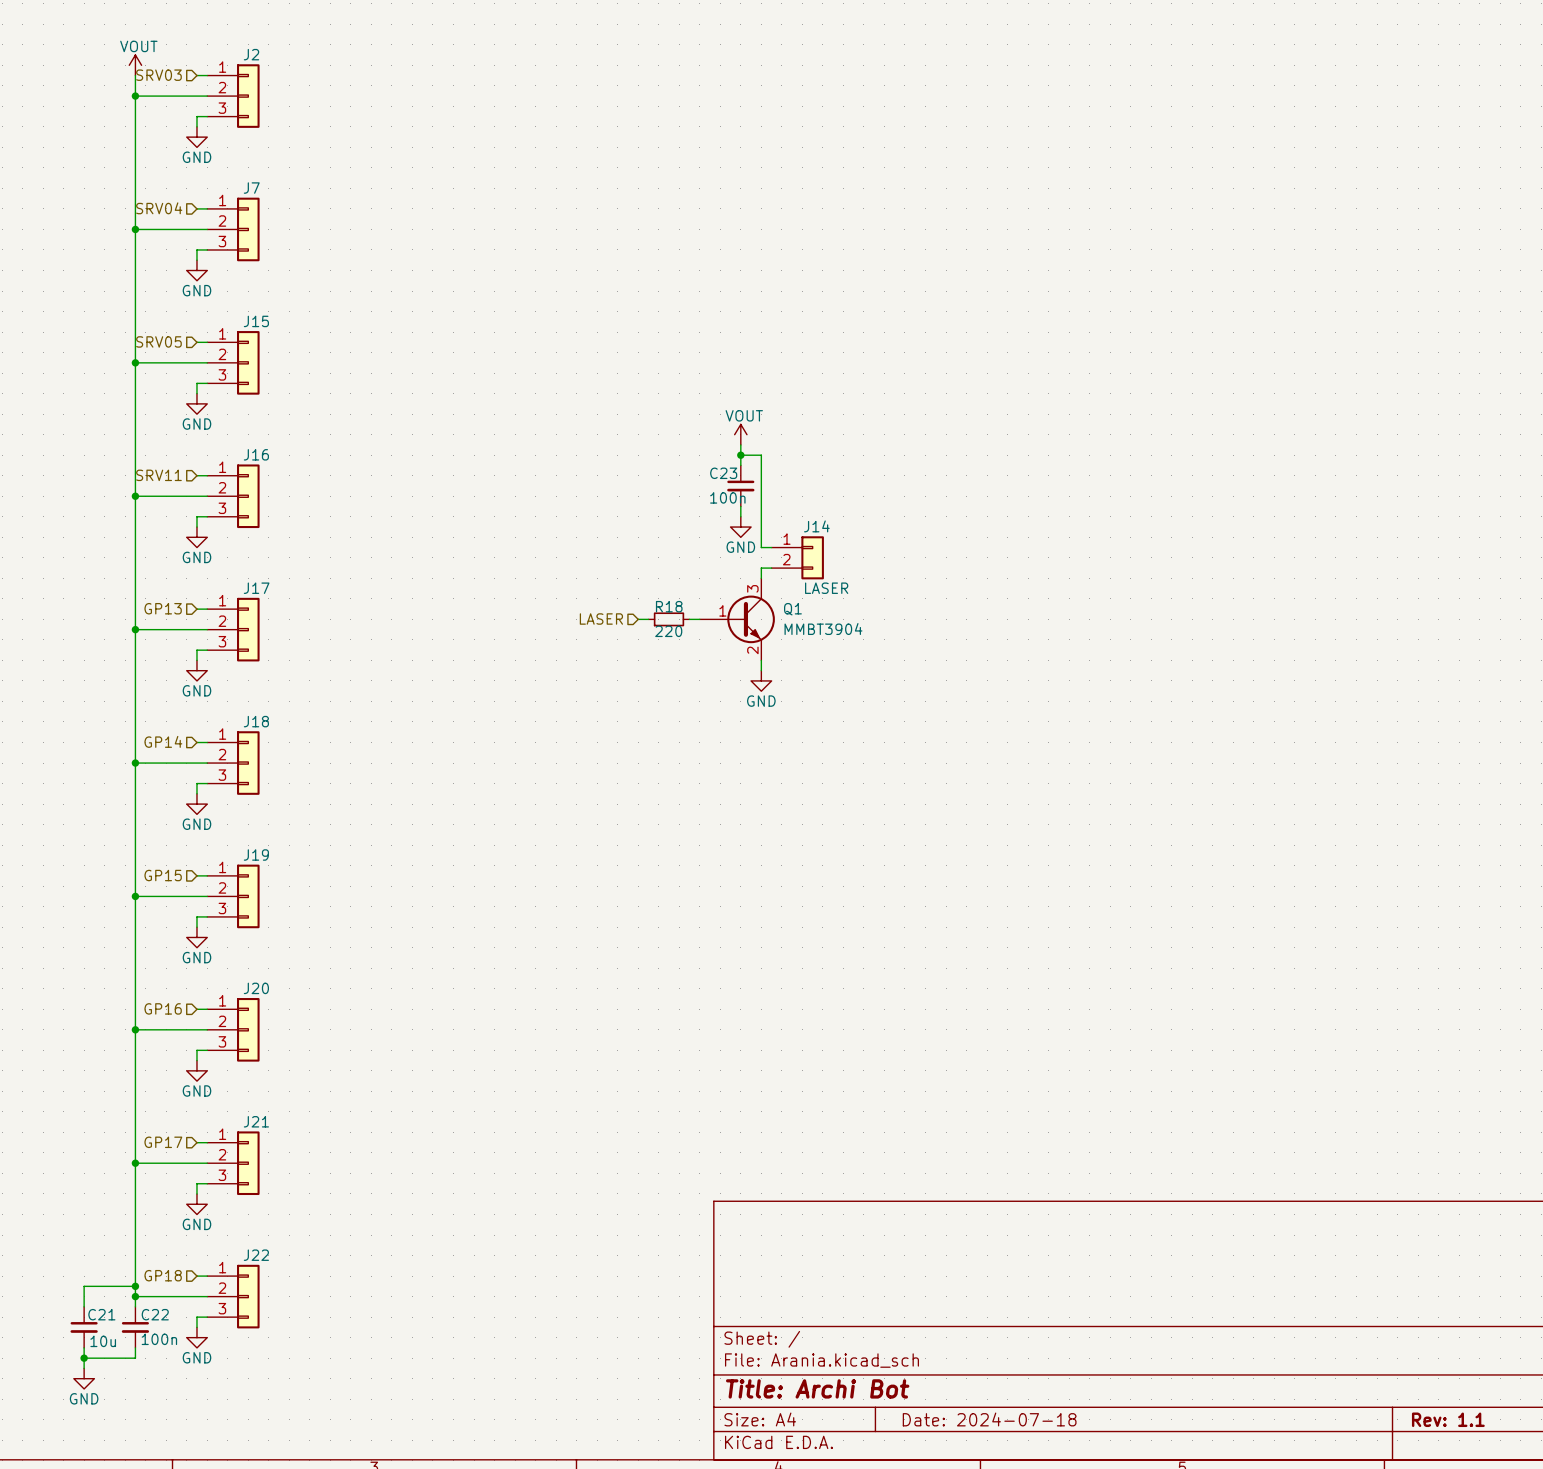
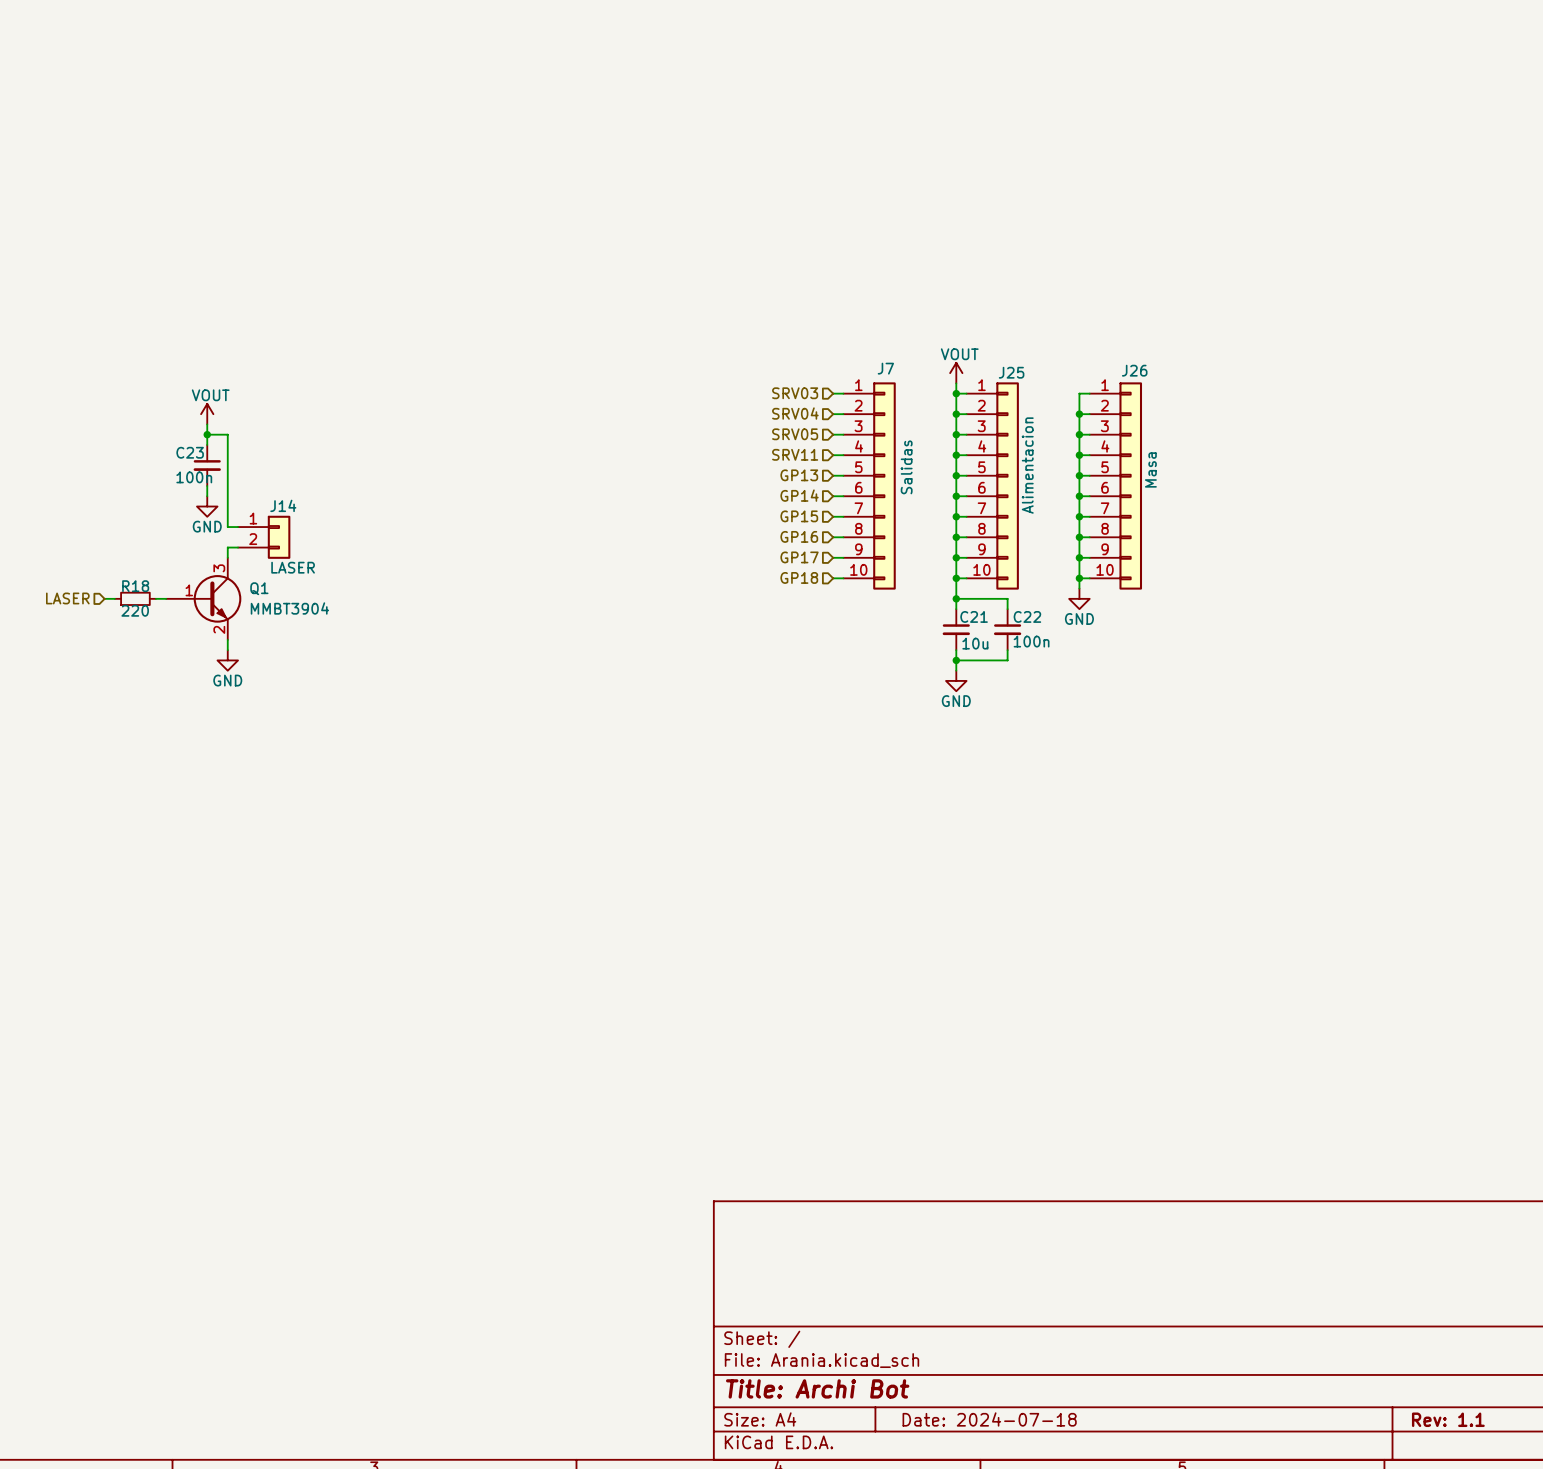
power symbol: VOUT (135, 65) -> none
wire: (135, 75) (135, 1306) -> none
hierarchical label: SRV03 (158, 75) -> none
wire: (196, 75) (207, 75) -> none
wire: (135, 96) (207, 96) -> none
junction: (135, 96) -> none
J2: (233, 96) -> none
wire: (207, 116) (196, 116) (196, 126) -> none
power symbol: GND (196, 137) -> none
J7 name position: J7 (251, 188) -> J7 (885, 368)
J7 symbol: [207, 197, 260, 262] -> [843, 382, 896, 590]
hierarchical label: SRV04 (159, 208) -> none
wire: (196, 208) (207, 208) -> none
wire: (135, 229) (207, 229) -> none
junction: (135, 229) -> none
wire: (207, 249) (196, 249) (196, 260) -> none
power symbol: GND (196, 270) -> none
hierarchical label: SRV05 (158, 341) -> none
wire: (196, 342) (207, 342) -> none
wire: (135, 362) (207, 362) -> none
junction: (135, 362) -> none
J15: (233, 362) -> none
power symbol: none -> VOUT (956, 373)
wire: (207, 383) (196, 383) (196, 393) -> none
wire: none -> (956, 383) (956, 609)
hierarchical label: none -> SRV03 (795, 393)
wire: none -> (833, 393) (843, 393)
wire: none -> (956, 393) (966, 393)
junction: none -> (956, 393)
wire: none -> (1089, 393) (1079, 393) (1079, 588)
power symbol: GND (196, 403) -> none
hierarchical label: none -> SRV04 (795, 413)
power symbol: none -> VOUT (207, 414)
wire: none -> (833, 414) (843, 414)
wire: none -> (956, 414) (966, 414)
junction: none -> (956, 414)
wire: none -> (1079, 414) (1089, 414)
junction: none -> (1079, 414)
wire: none -> (207, 424) (207, 444)
wire: none -> (207, 434) (227, 434) (227, 527) (238, 527)
junction: none -> (207, 434)
power symbol: VOUT (740, 434) -> none
hierarchical label: none -> SRV05 (795, 434)
wire: none -> (833, 434) (843, 434)
wire: none -> (956, 434) (966, 434)
junction: none -> (956, 434)
wire: none -> (1079, 434) (1089, 434)
junction: none -> (1079, 434)
wire: (740, 444) (740, 465) -> none
hierarchical label: none -> SRV11 (795, 454)
wire: (740, 455) (761, 455) (761, 547) (771, 547) -> none
junction: (740, 455) -> none
wire: none -> (833, 455) (843, 455)
wire: none -> (956, 455) (966, 455)
junction: none -> (956, 455)
wire: none -> (1079, 455) (1089, 455)
junction: none -> (1079, 455)
J7 value: none -> Salidas (906, 467)
hierarchical label: SRV11 (158, 475) -> none
wire: (196, 475) (207, 475) -> (104, 598) (114, 598)
hierarchical label: none -> GP13 (799, 475)
wire: none -> (833, 475) (843, 475)
wire: none -> (956, 475) (966, 475)
junction: none -> (956, 475)
wire: none -> (1079, 475) (1089, 475)
junction: none -> (1079, 475)
C23 position: (740, 485) -> (207, 465)
J25: none -> Alimentacion (992, 485)
J26: none -> Masa (1115, 485)
hierarchical label: none -> GP14 (799, 495)
wire: (135, 496) (207, 496) -> (207, 485) (207, 496)
junction: (135, 496) -> none
J16: (233, 496) -> none
wire: none -> (833, 496) (843, 496)
wire: none -> (956, 496) (966, 496)
junction: none -> (956, 496)
wire: none -> (1079, 496) (1089, 496)
junction: none -> (1079, 496)
wire: (740, 506) (740, 516) -> none
wire: (207, 516) (196, 516) (196, 527) -> (238, 547) (227, 547) (227, 557)
hierarchical label: none -> GP15 (799, 516)
wire: none -> (833, 516) (843, 516)
wire: none -> (956, 516) (966, 516)
junction: none -> (956, 516)
wire: none -> (1079, 516) (1089, 516)
junction: none -> (1079, 516)
power symbol: GND (740, 527) -> none
hierarchical label: none -> GP16 (799, 536)
power symbol position: GND (196, 537) -> GND (207, 506)
wire: none -> (833, 537) (843, 537)
wire: none -> (956, 537) (966, 537)
junction: none -> (956, 537)
wire: none -> (1079, 537) (1089, 537)
junction: none -> (1079, 537)
J14 position: (797, 557) -> (264, 537)
hierarchical label: none -> GP17 (799, 557)
wire: none -> (833, 557) (843, 557)
wire: none -> (956, 557) (966, 557)
junction: none -> (956, 557)
wire: none -> (1079, 557) (1089, 557)
junction: none -> (1079, 557)
wire: (771, 568) (761, 568) (761, 578) -> none
hierarchical label: none -> GP18 (799, 577)
wire: none -> (956, 578) (966, 578)
junction: none -> (956, 578)
wire: none -> (1079, 578) (1089, 578)
junction: none -> (1079, 578)
hierarchical label: none -> LASER (67, 598)
wire: none -> (956, 598) (1007, 598) (1007, 609)
junction: none -> (956, 598)
power symbol: none -> GND (1079, 598)
hierarchical label: GP13 (163, 608) -> none
wire: (196, 609) (207, 609) -> (155, 598) (166, 598)
hierarchical label: LASER (601, 619) -> none
wire: (638, 619) (648, 619) -> none
R18 position: (668, 619) -> (135, 598)
wire: (689, 619) (699, 619) -> (833, 578) (843, 578)
Q1 position: (737, 619) -> (203, 598)
wire: (135, 629) (207, 629) -> none
junction: (135, 629) -> none
J17: (233, 629) -> none
wire: none -> (227, 639) (227, 650)
wire: (207, 650) (196, 650) (196, 660) -> none
wire: none -> (956, 650) (956, 670)
wire: none -> (1007, 650) (1007, 660) (956, 660)
wire: (761, 660) (761, 670) -> none
junction: none -> (956, 660)
power symbol position: GND (196, 670) -> GND (227, 660)
power symbol: GND (761, 680) -> none
power symbol: none -> GND (956, 680)
hierarchical label: GP14 (163, 741) -> none
wire: (196, 742) (207, 742) -> none
wire: (135, 763) (207, 763) -> none
junction: (135, 763) -> none
J18: (233, 763) -> none
wire: (207, 783) (196, 783) (196, 793) -> none
power symbol: GND (196, 804) -> none
hierarchical label: GP15 (163, 875) -> none
wire: (196, 875) (207, 875) -> none
wire: (135, 896) (207, 896) -> none
junction: (135, 896) -> none
J19: (233, 896) -> none
wire: (207, 916) (196, 916) (196, 927) -> none
power symbol: GND (196, 937) -> none
hierarchical label: GP16 (163, 1008) -> none
wire: (196, 1009) (207, 1009) -> none
wire: (135, 1029) (207, 1029) -> none
junction: (135, 1029) -> none
J20: (233, 1029) -> none
wire: (207, 1050) (196, 1050) (196, 1060) -> none
power symbol: GND (196, 1070) -> none
hierarchical label: GP17 (163, 1142) -> none
wire: (196, 1142) (207, 1142) -> none
wire: (135, 1163) (207, 1163) -> none
junction: (135, 1163) -> none
J21: (233, 1163) -> none
wire: (207, 1183) (196, 1183) (196, 1193) -> none
power symbol: GND (196, 1204) -> none
hierarchical label: GP18 (163, 1275) -> none
wire: (196, 1276) (207, 1276) -> none
wire: (135, 1286) (84, 1286) (84, 1306) -> none
junction: (135, 1286) -> none
wire: (135, 1296) (207, 1296) -> none
junction: (135, 1296) -> none
J22: (233, 1296) -> none
wire: (207, 1317) (196, 1317) (196, 1327) -> none
C21 position: (84, 1327) -> (956, 629)
C22 position: (135, 1327) -> (1007, 629)
power symbol: GND (196, 1337) -> none
wire: (84, 1347) (84, 1368) -> none
wire: (135, 1347) (135, 1358) (84, 1358) -> none
junction: (84, 1358) -> none
power symbol: GND (84, 1378) -> none

